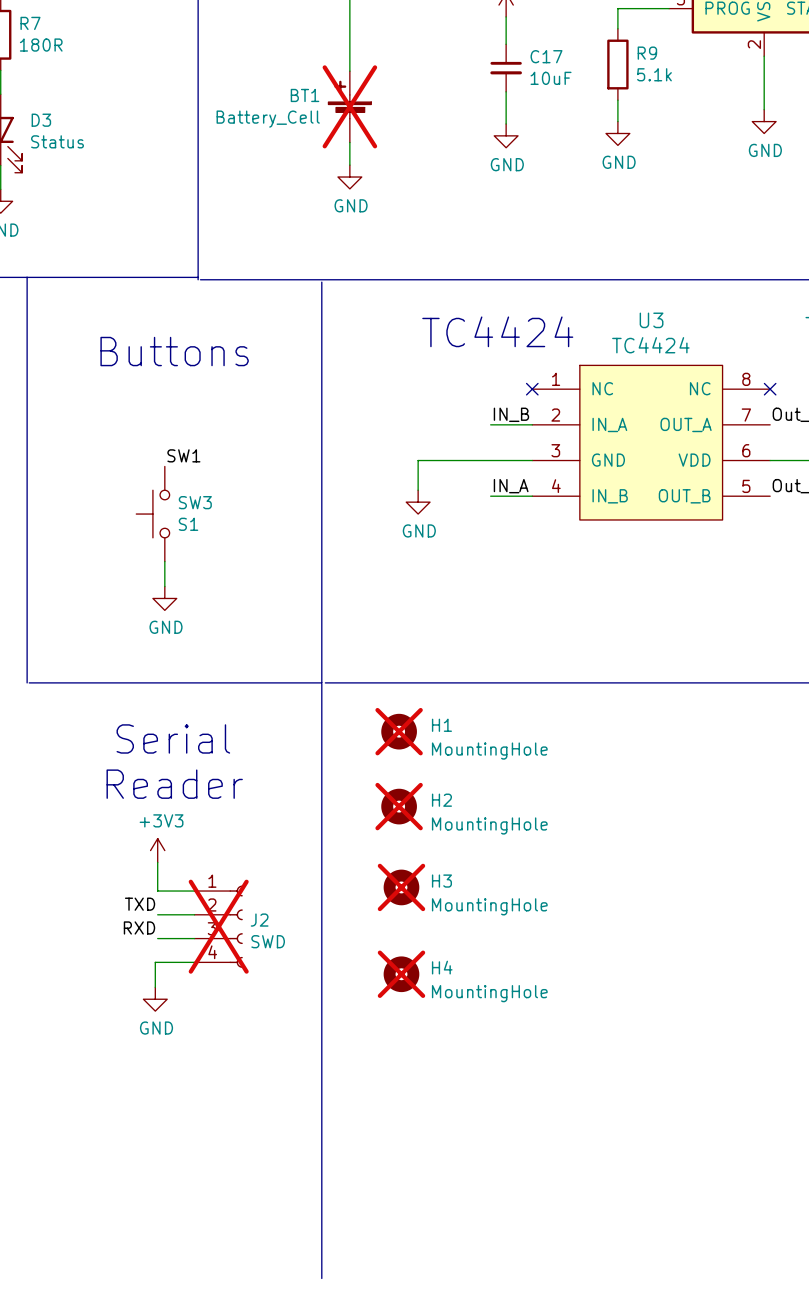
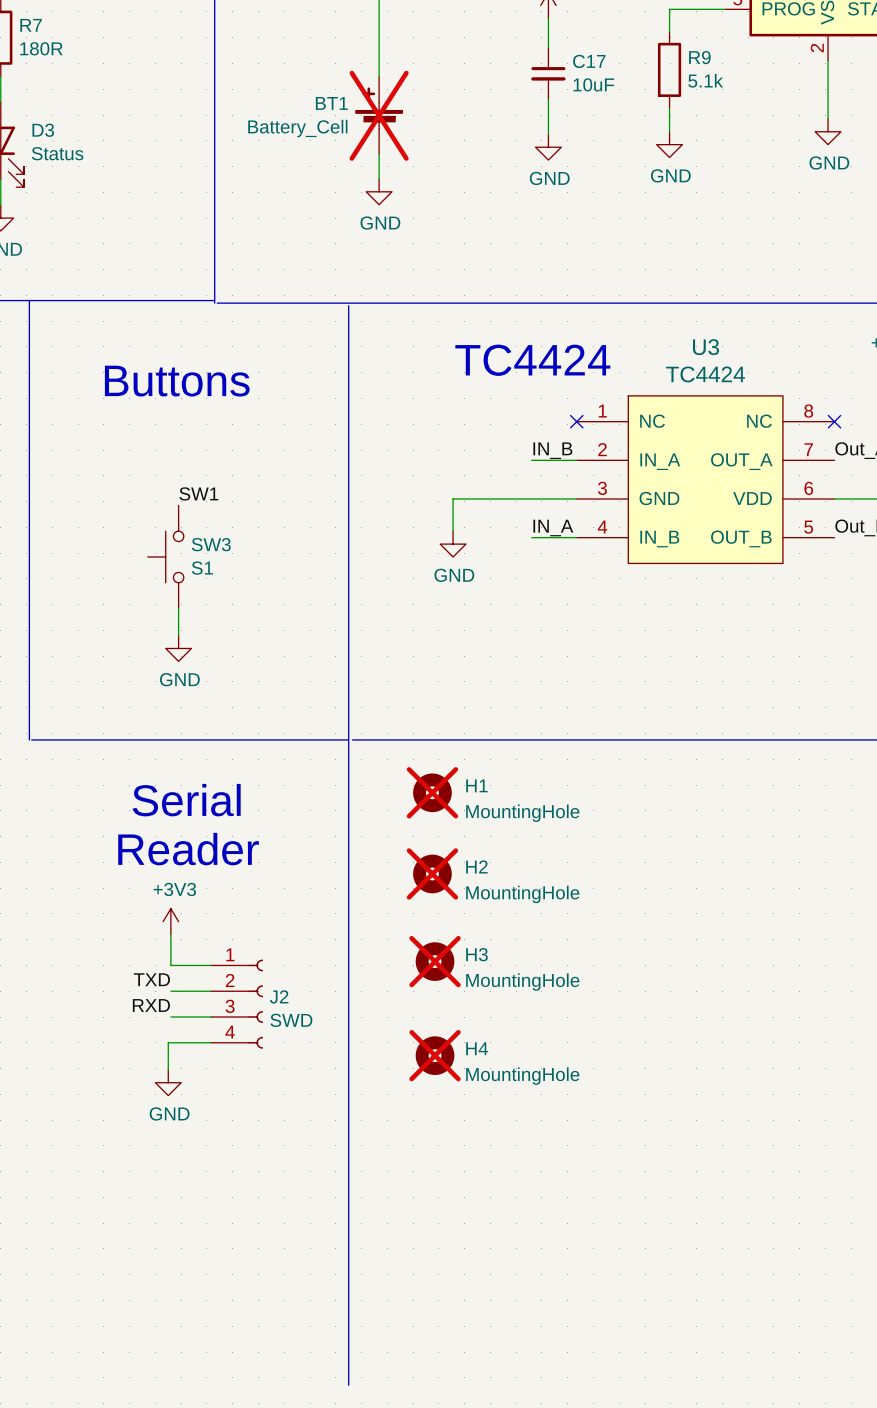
J2 do-not-place cross: (218, 926) -> none

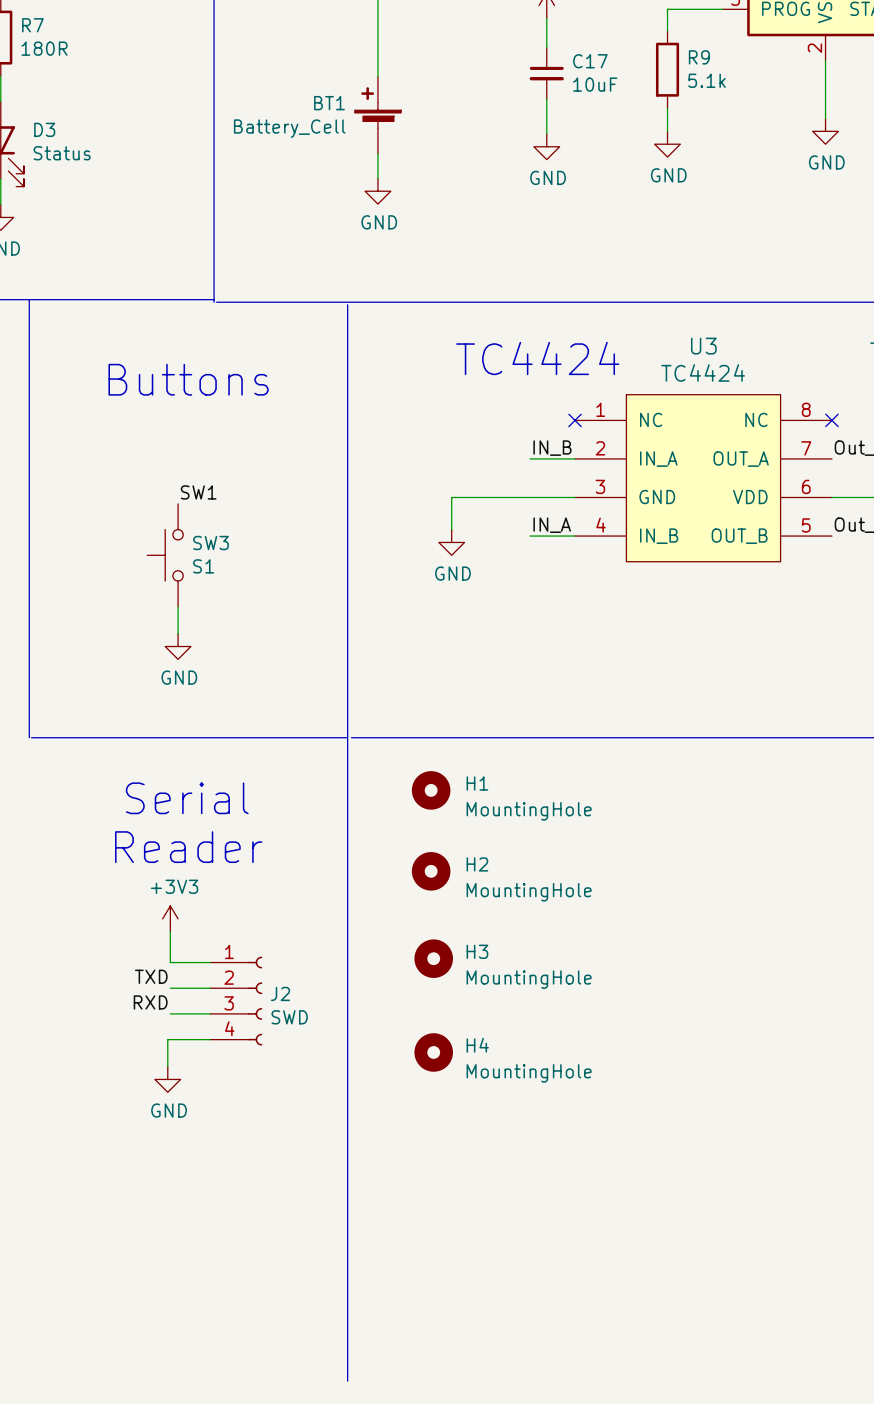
BT1 do-not-place cross: (379, 115) -> none
H1 do-not-place cross: (432, 792) -> none
H2 do-not-place cross: (432, 873) -> none
H3 do-not-place cross: (435, 961) -> none
H4 do-not-place cross: (435, 1055) -> none

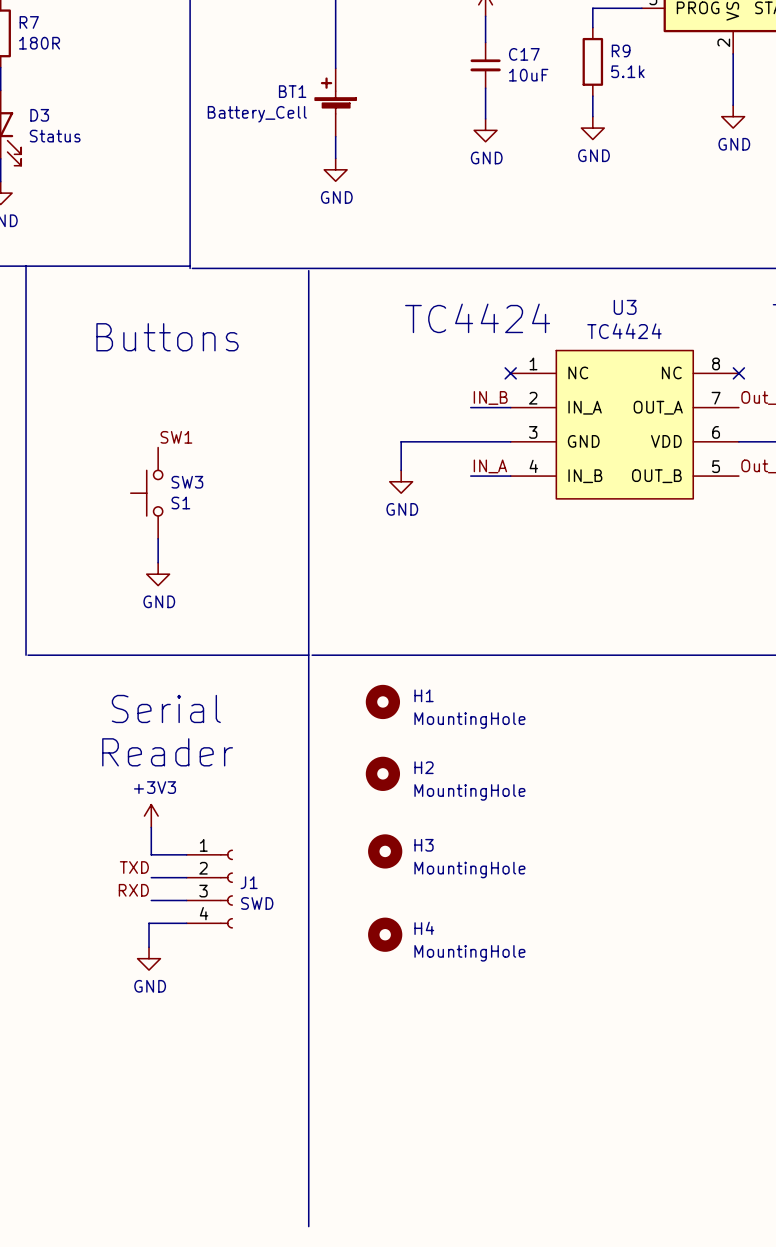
J2 name: J2 (280, 993) -> J1 (249, 882)

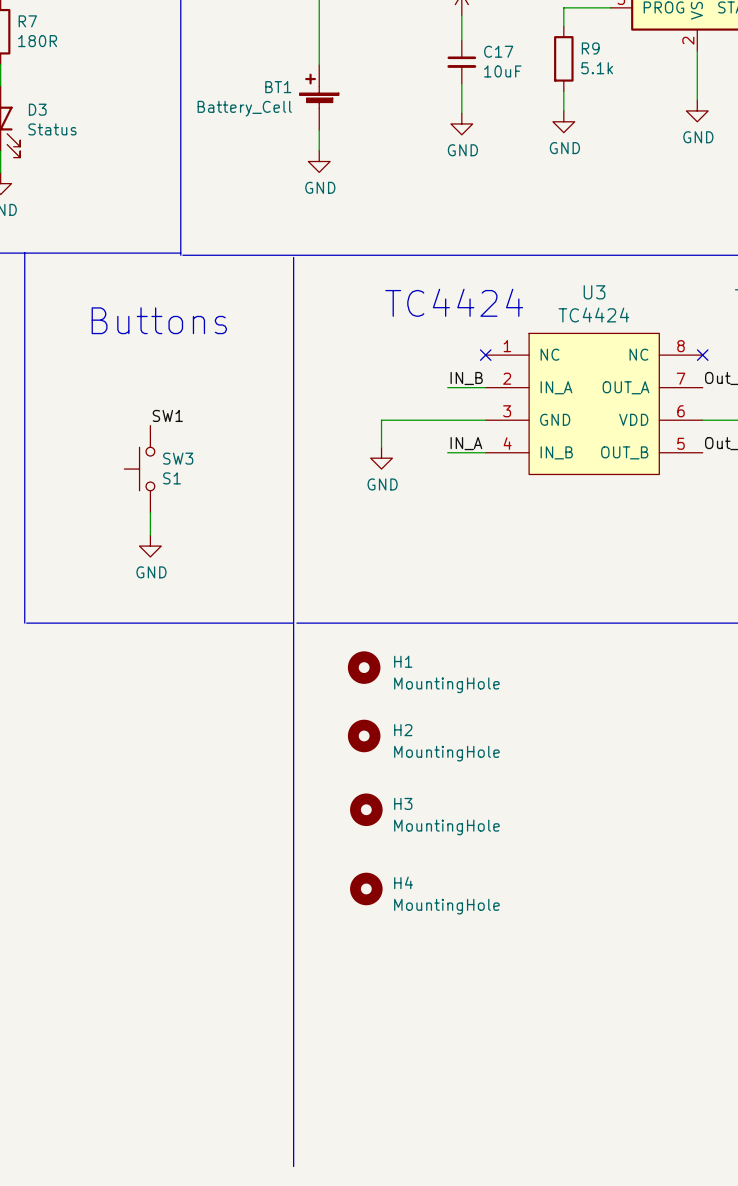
text: Serial (166, 708) -> none
text: Reader (167, 752) -> none
power symbol: +3V3 (151, 816) -> none
wire: (151, 827) (151, 854) (186, 854) -> none
label: TXD (134, 867) -> none
wire: (151, 877) (186, 877) -> none
J1: SWD (209, 889) -> none
label: RXD (133, 890) -> none
wire: (151, 900) (186, 900) -> none
wire: (186, 923) (149, 923) (149, 947) -> none
power symbol: GND (149, 958) -> none

